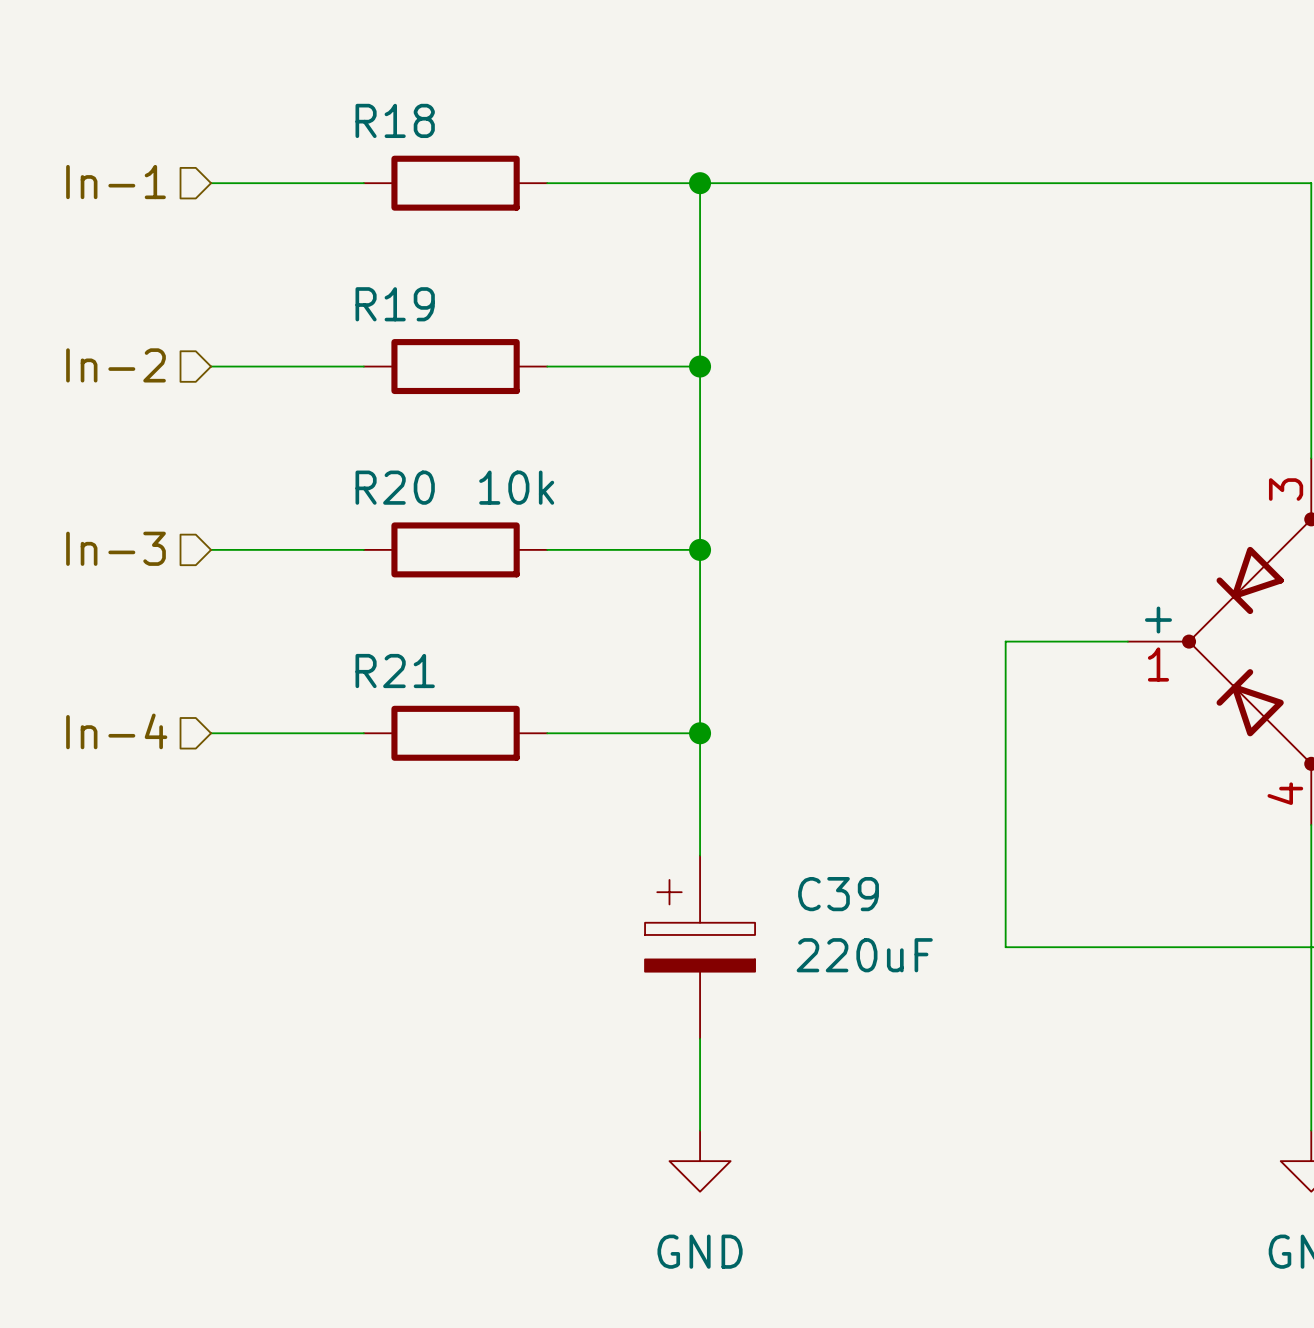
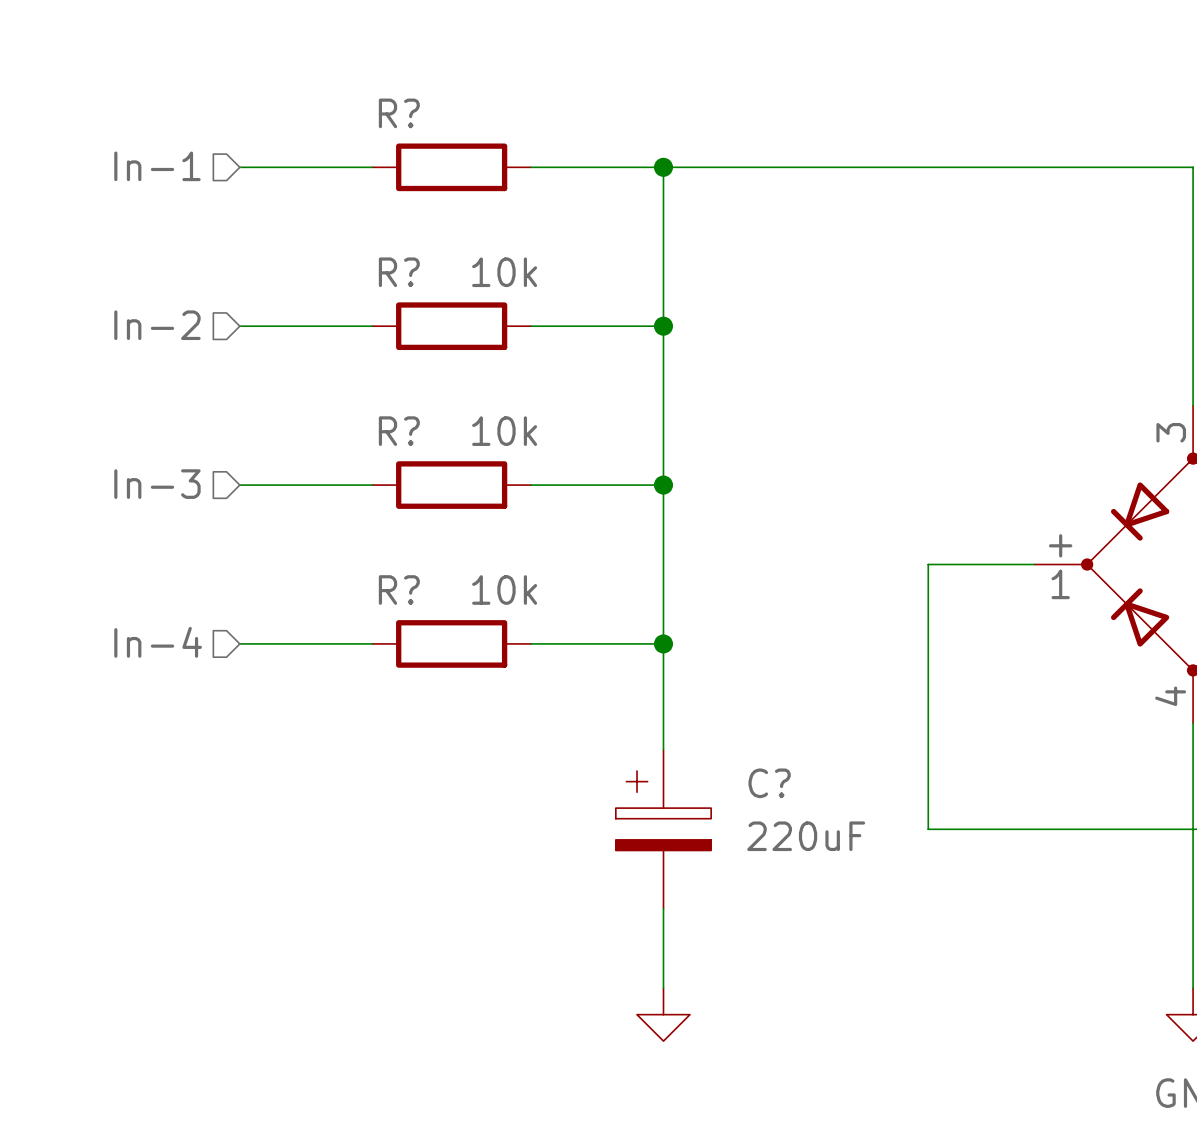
R18 name: R18 (395, 120) -> R? (399, 113)
R19 name: R19 (395, 304) -> R? (399, 272)
R19 value: none -> 10k (504, 272)
R20 name: R20 (395, 487) -> R? (399, 431)
R21 name: R21 (395, 671) -> R? (399, 589)
R21 value: none -> 10k (504, 589)
C39 name: C39 (838, 894) -> C? (769, 783)
power symbol text: GND (700, 1251) -> none

